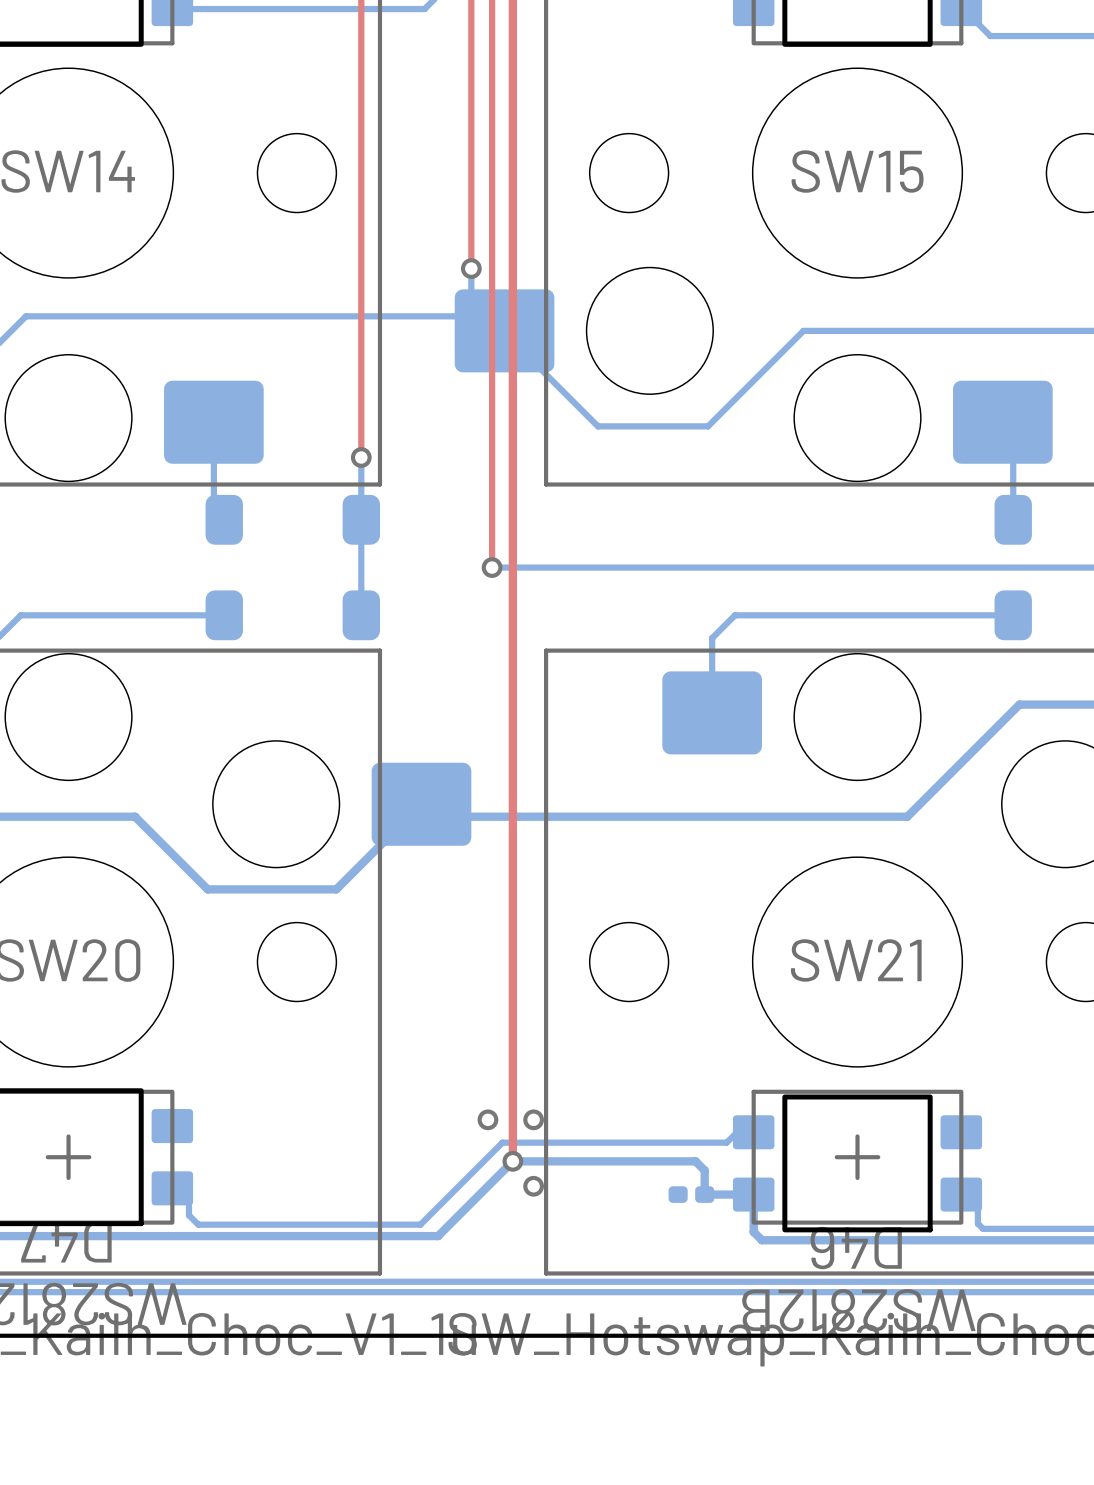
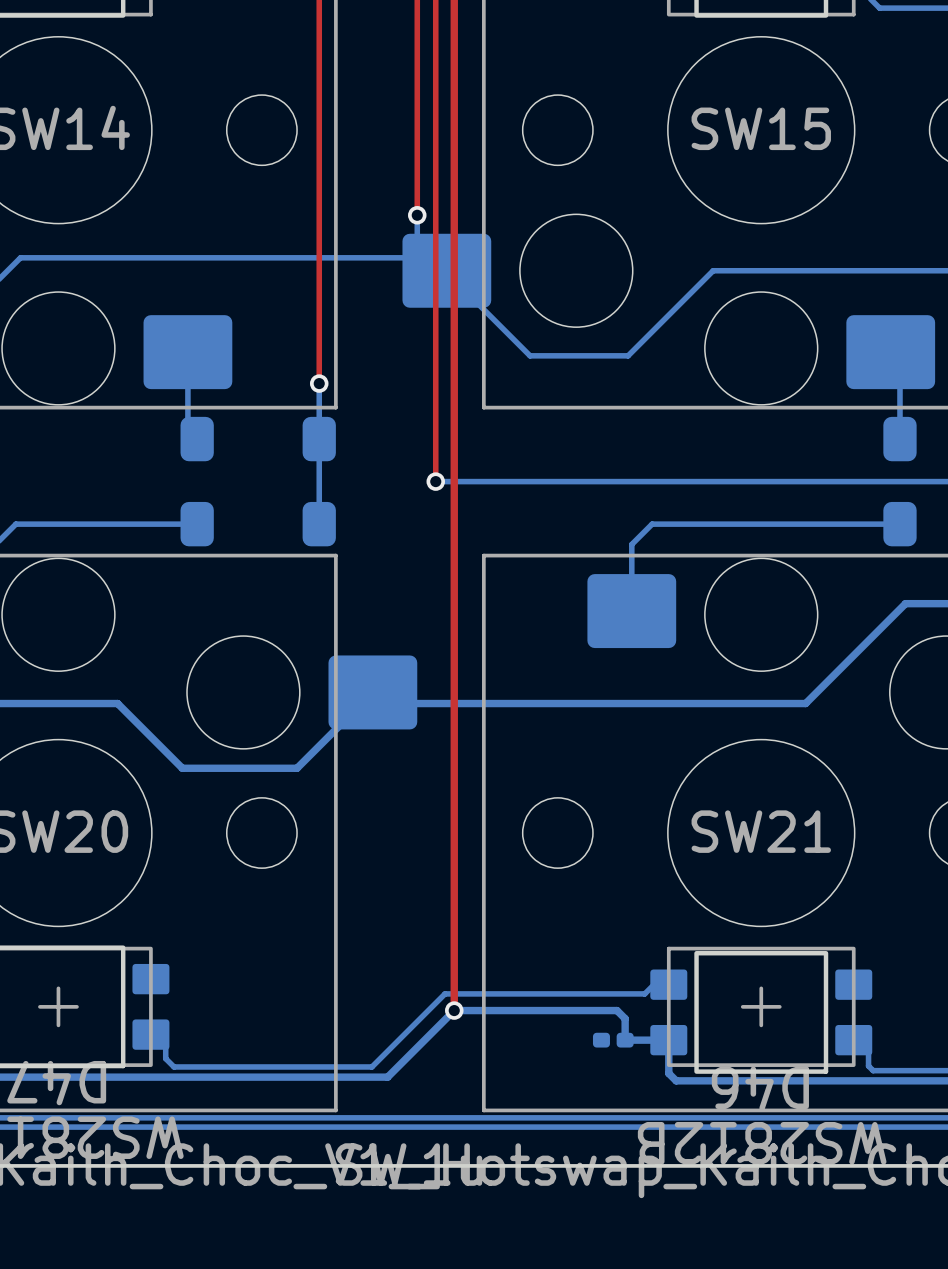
via: (487, 1119) -> none
via: (533, 1119) -> none
via: (533, 1186) -> none

